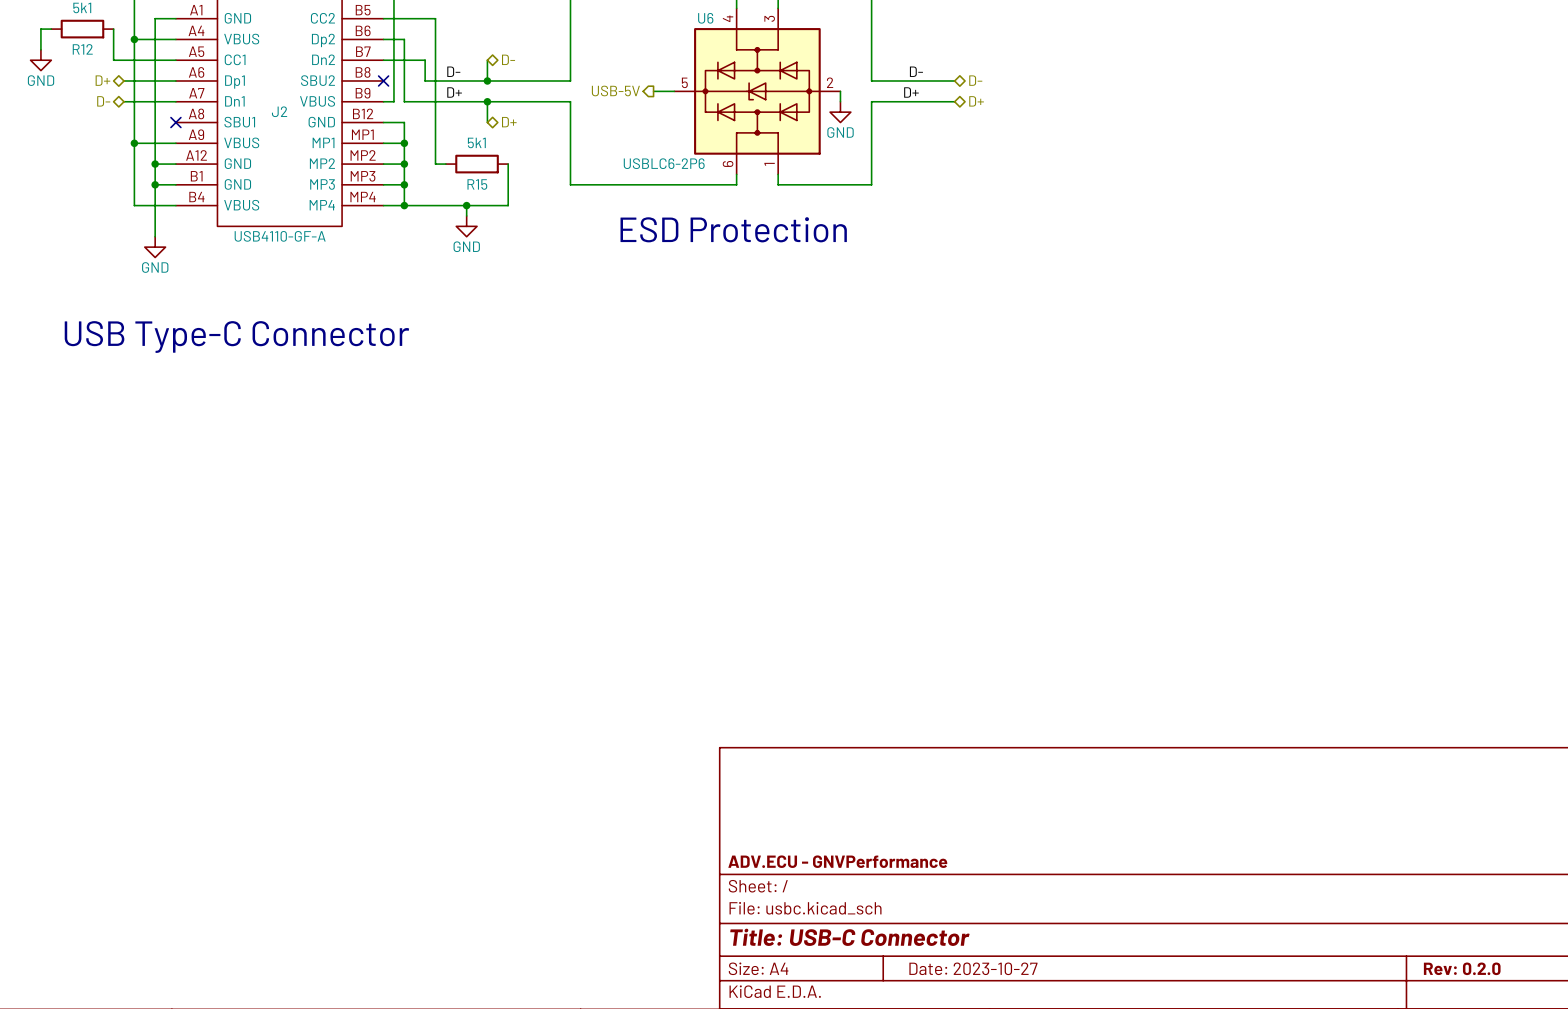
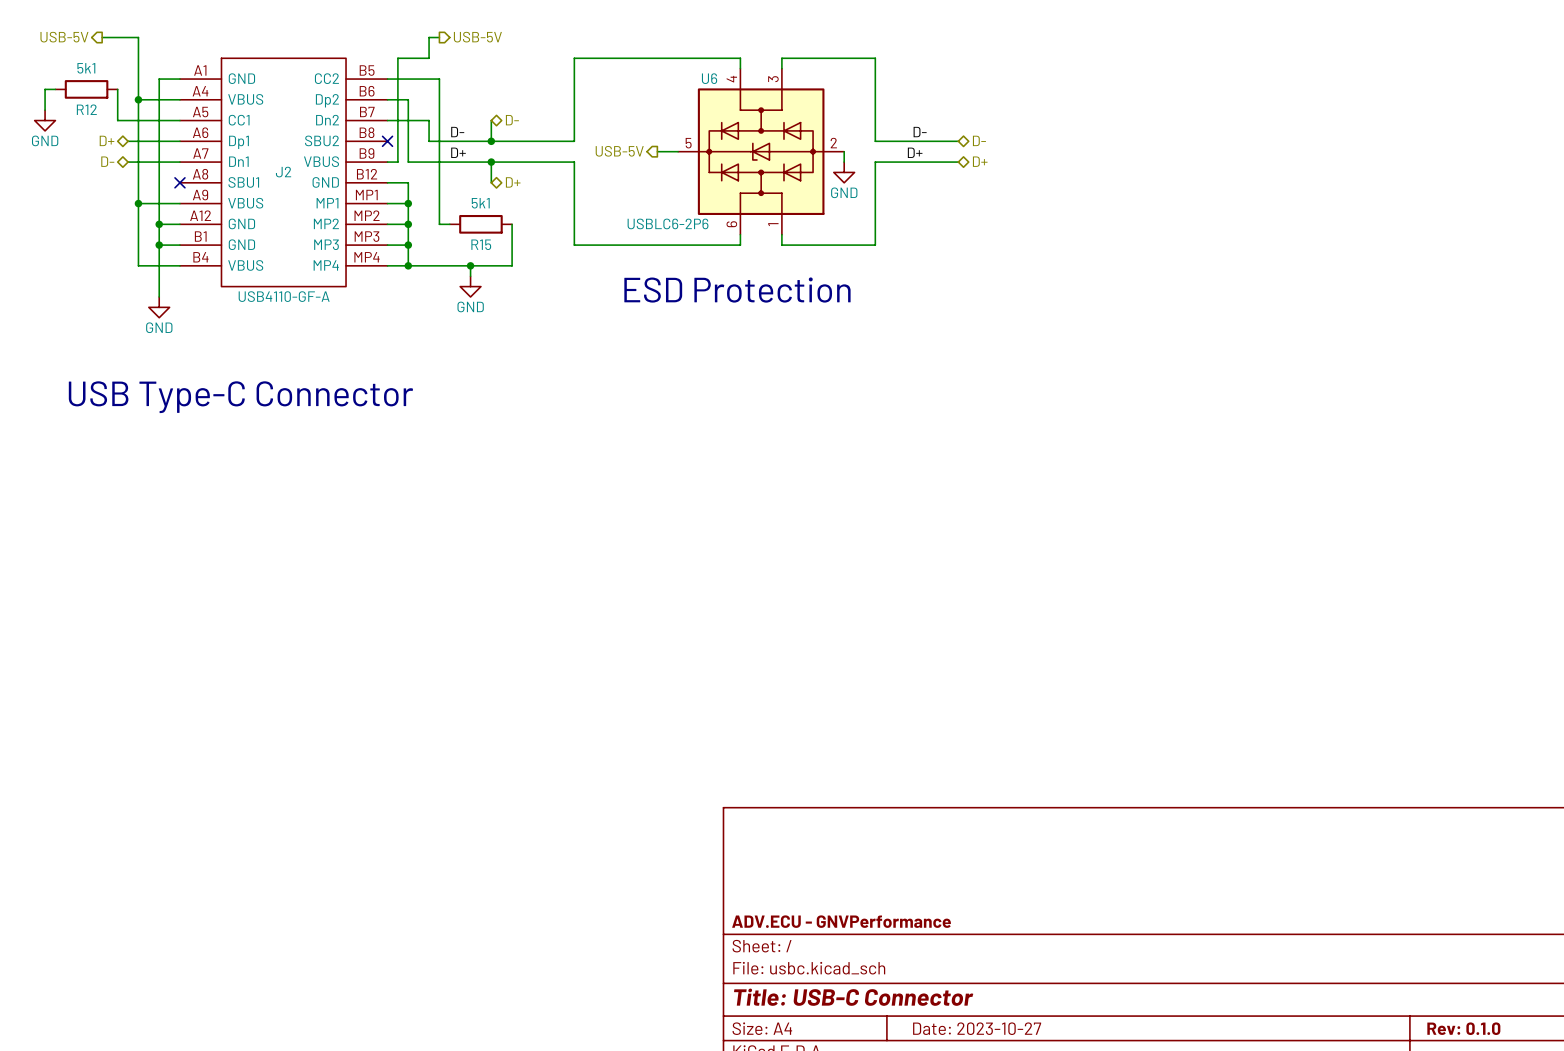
title block: Rev: 0.2.0 (1462, 968) -> Rev: 0.1.0 (1463, 1028)

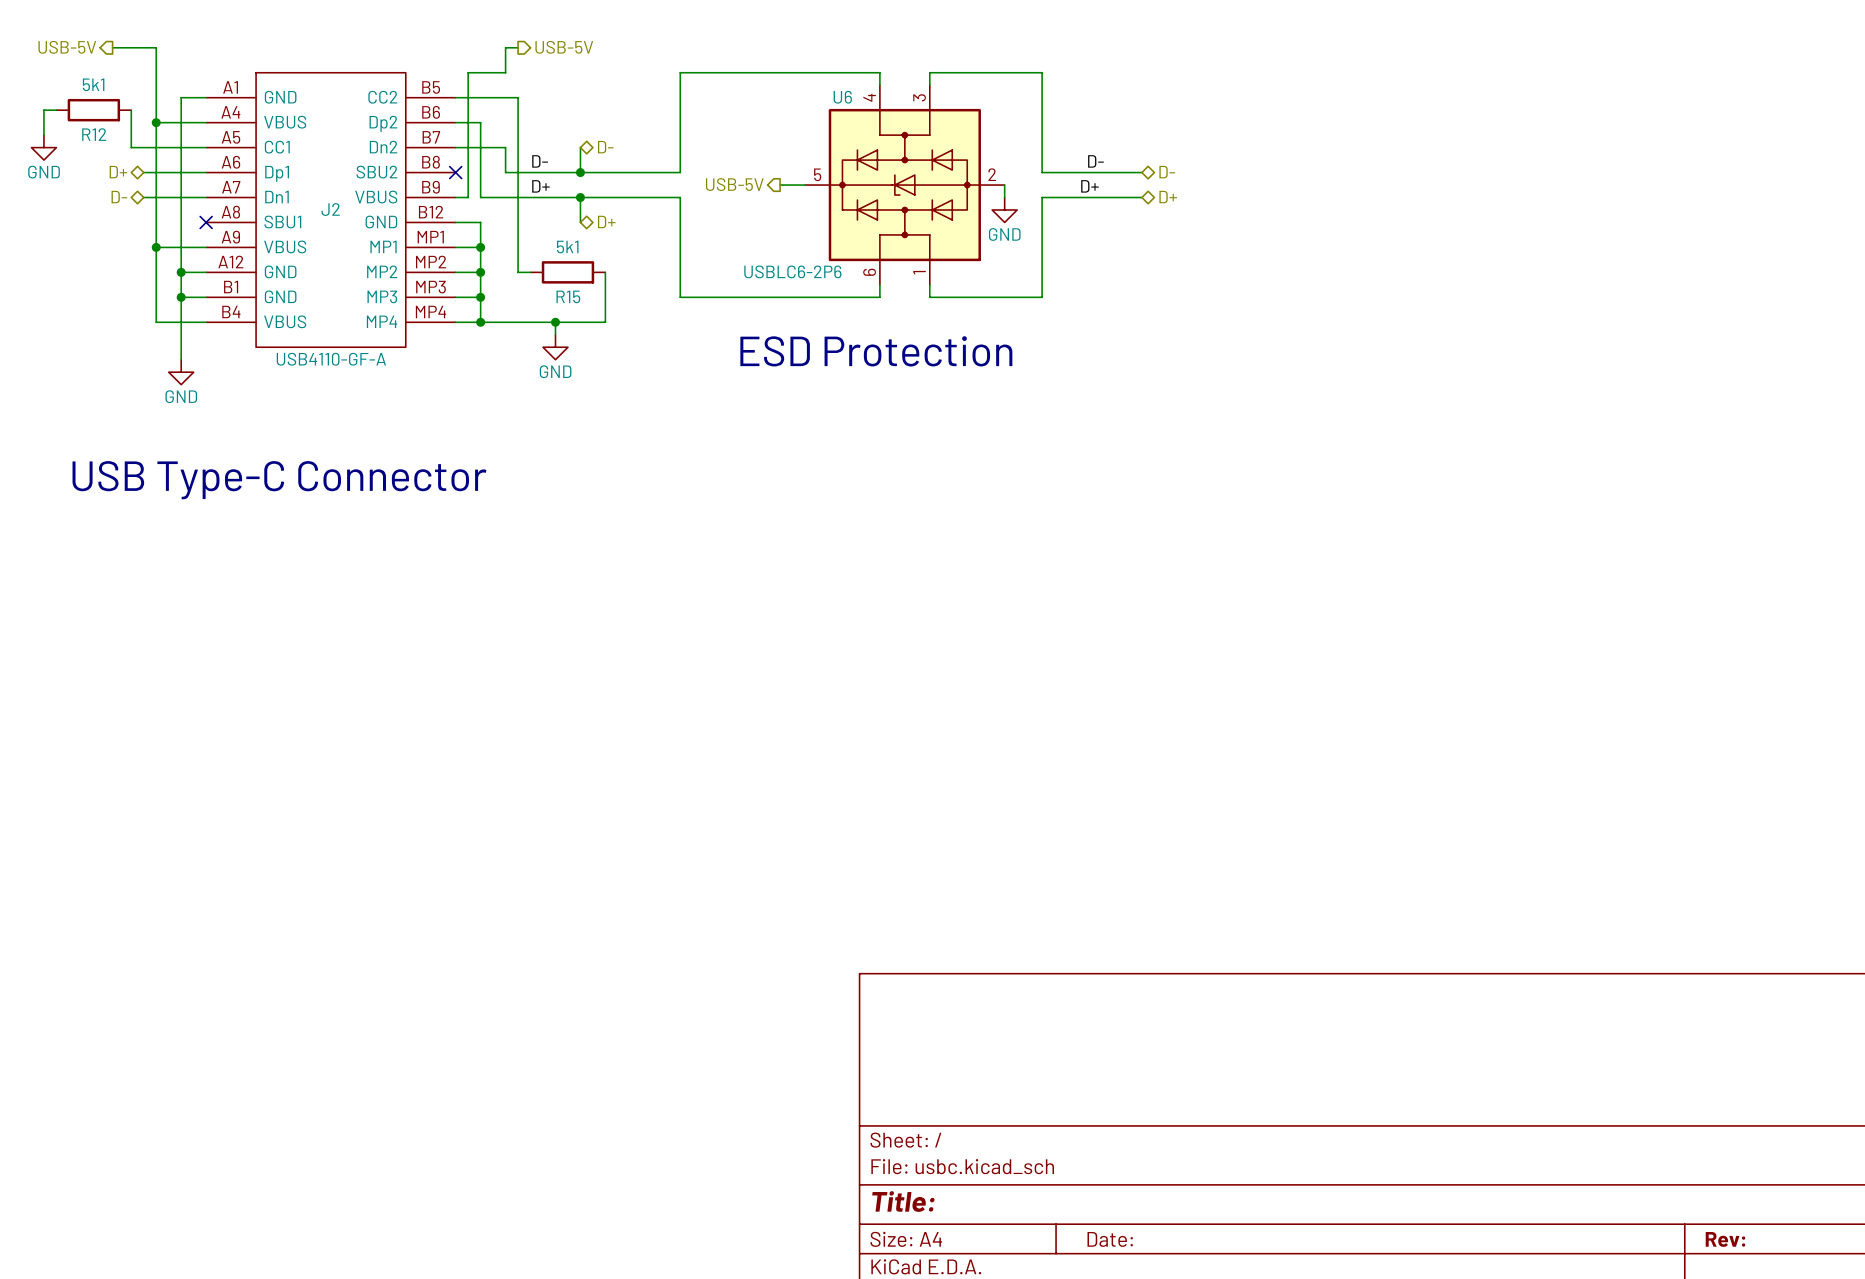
title block: ADV.ECU - GNVPerformance (841, 921) -> none
title block: Title: USB-C Connector (853, 997) -> Title: (903, 1201)
title block: Date: 2023-10-27 (977, 1028) -> Date: (1110, 1239)
title block: Rev: 0.1.0 (1463, 1028) -> Rev: (1725, 1239)

